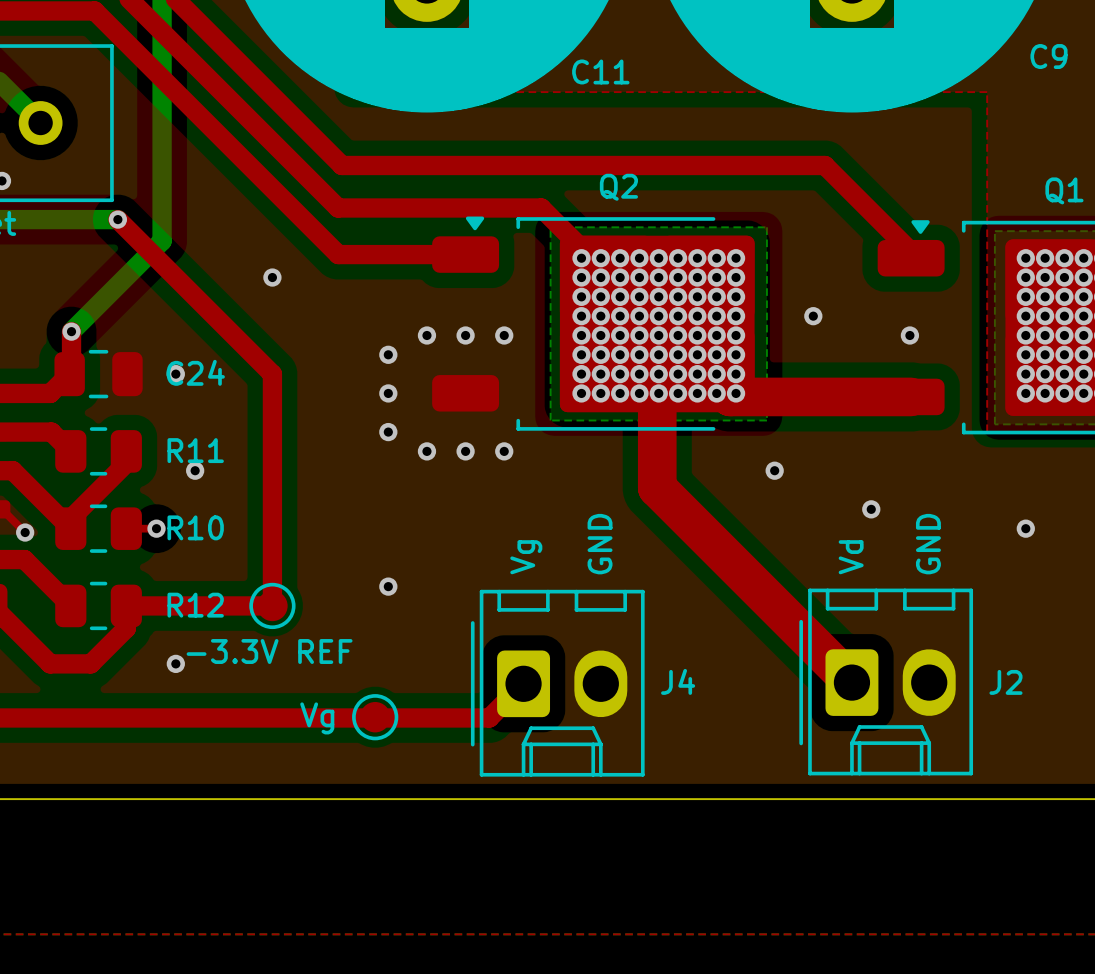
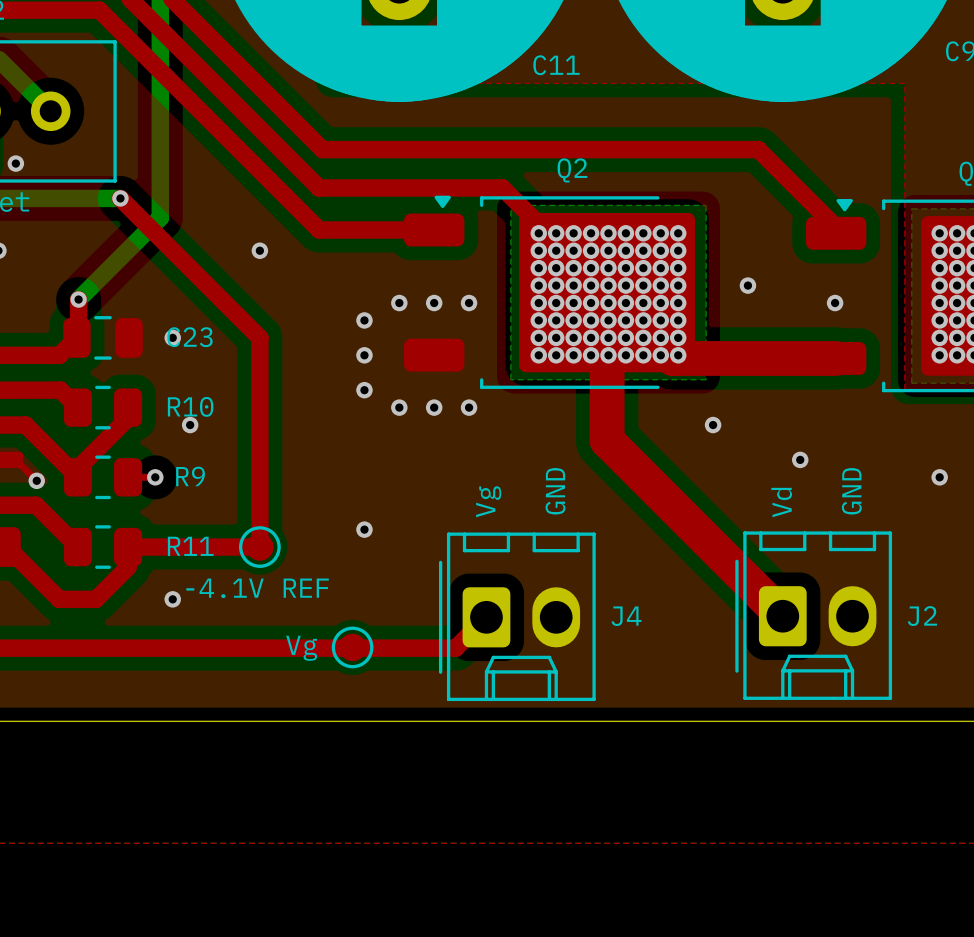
C24 name: C24 (195, 372) -> C23 (189, 337)
R11 name: R11 (195, 450) -> R10 (190, 406)
R10 name: R10 (195, 527) -> R9 (190, 476)
R12 name: R12 (195, 605) -> R11 (190, 546)
text: -3.3V REF (269, 651) -> -4.1V REF (257, 588)

